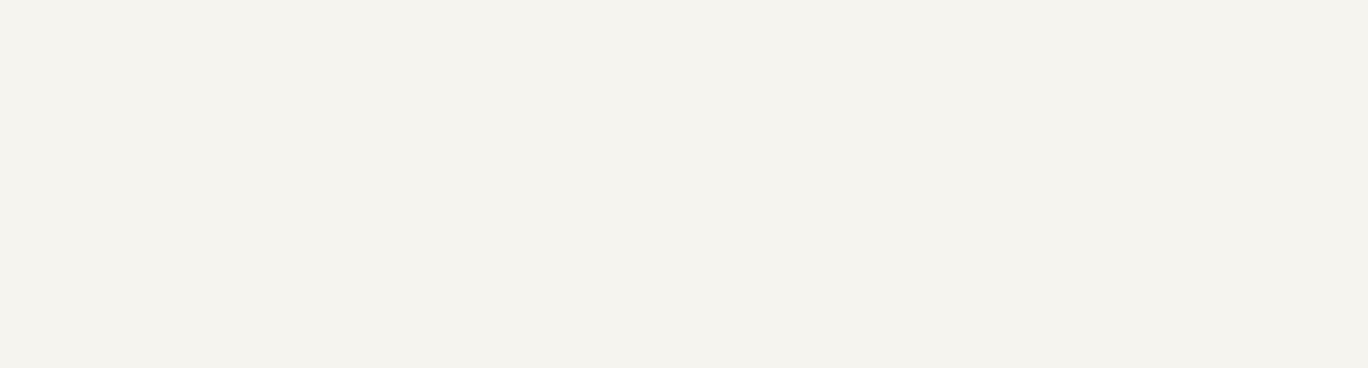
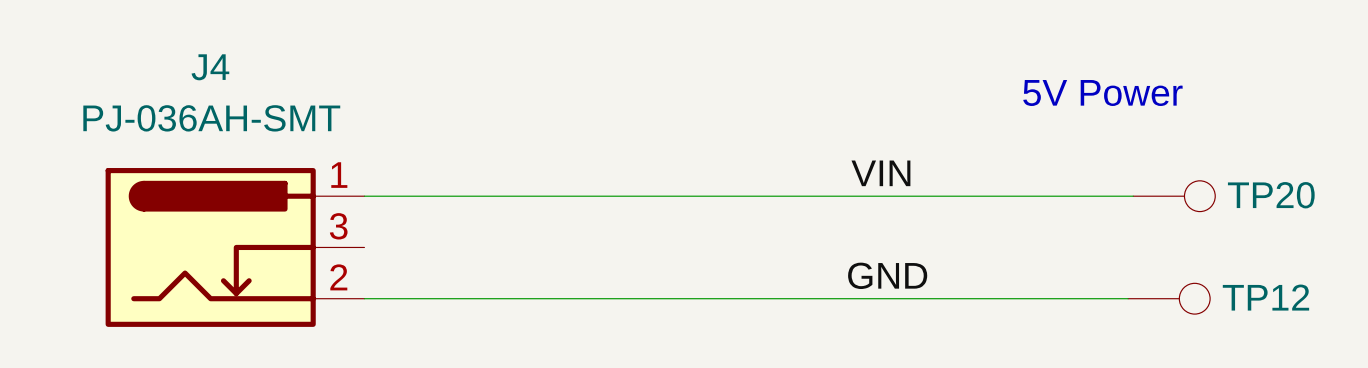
text: none -> 5V Power (1102, 93)
label: none -> VIN (880, 173)
wire: none -> (364, 196) (1133, 196)
TP20: none -> (1174, 196)
J4: none -> PJ-036AH-SMT (235, 247)
label: none -> GND (887, 275)
wire: none -> (364, 298) (1128, 298)
TP12: none -> (1169, 298)

